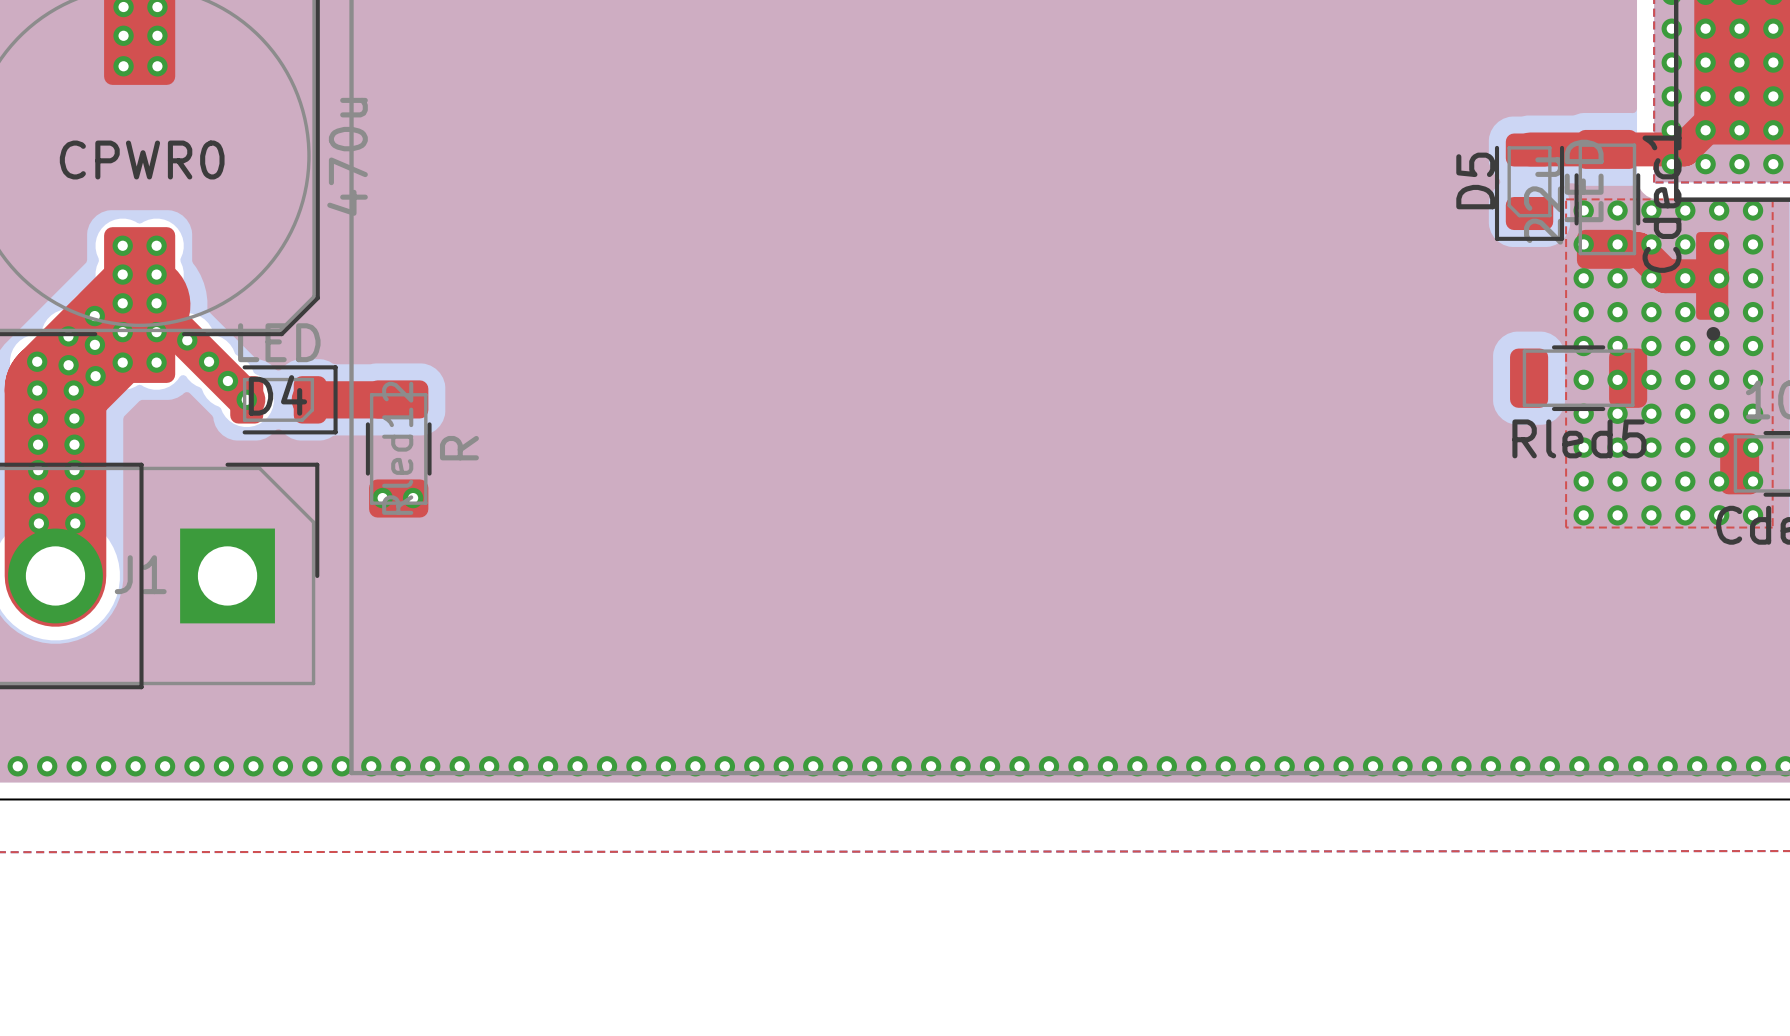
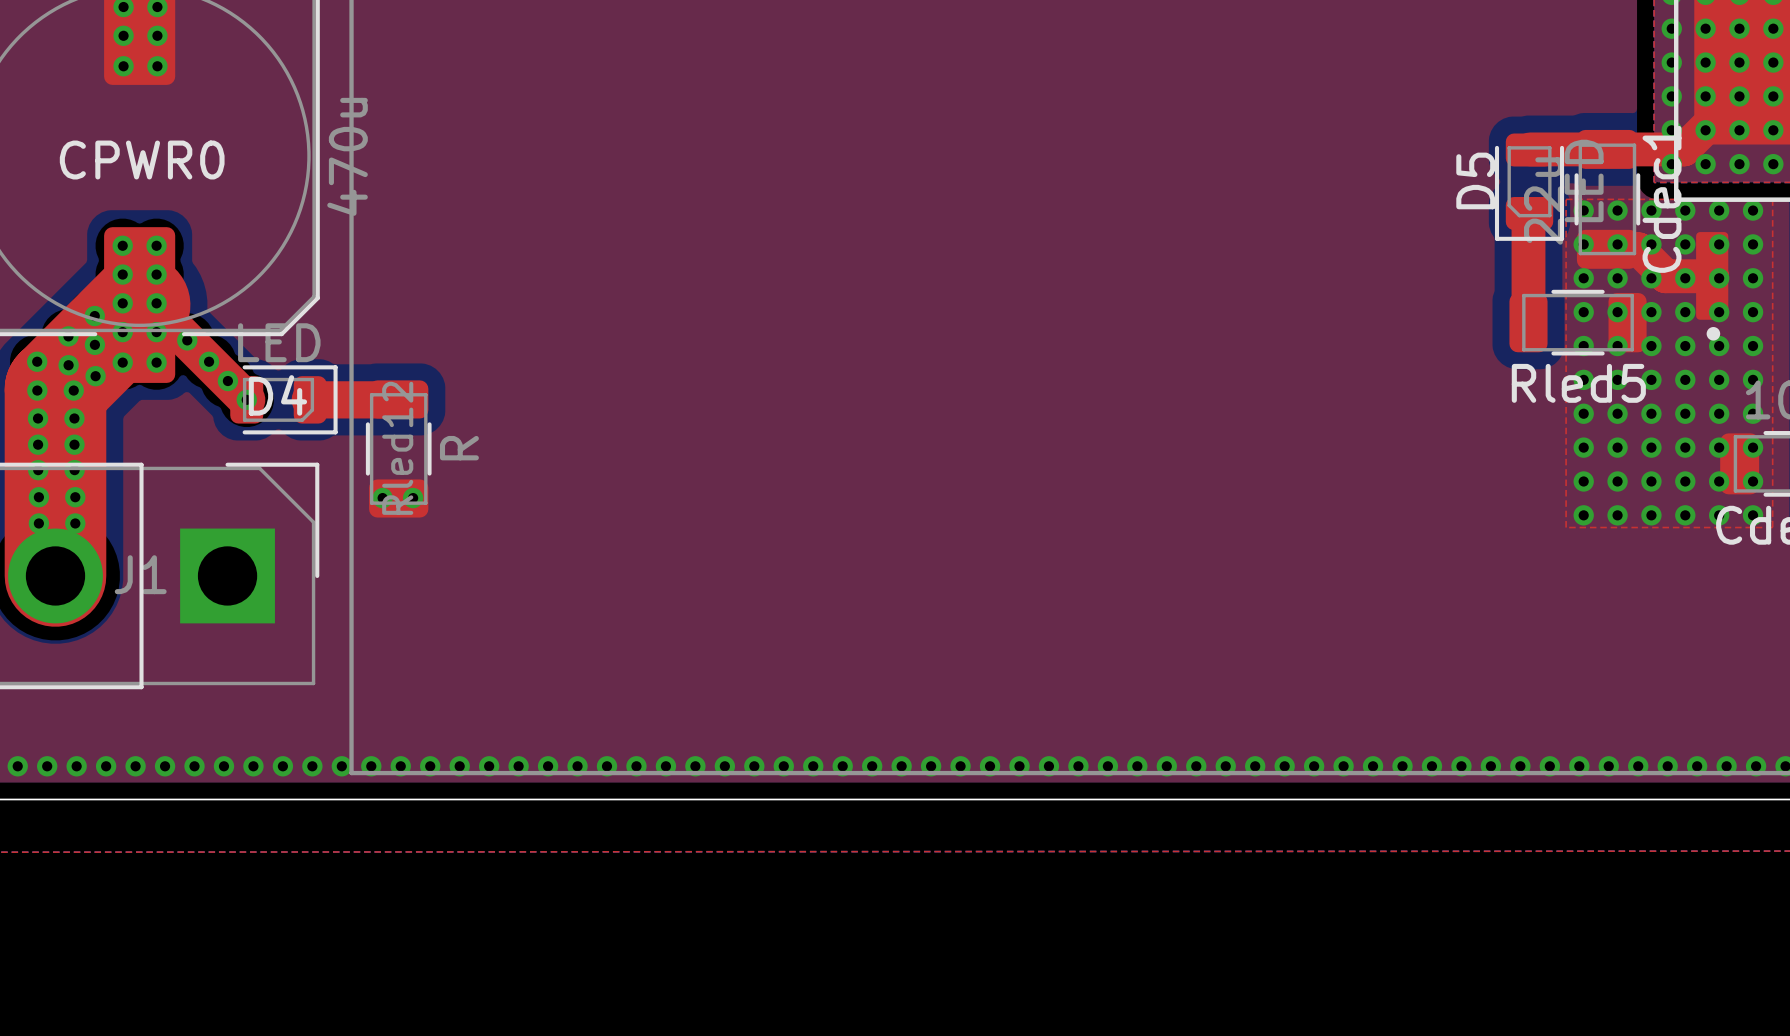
top track: none -> (1529, 213) (1528, 322)
Rled5 position: (1578, 378) -> (1578, 322)

